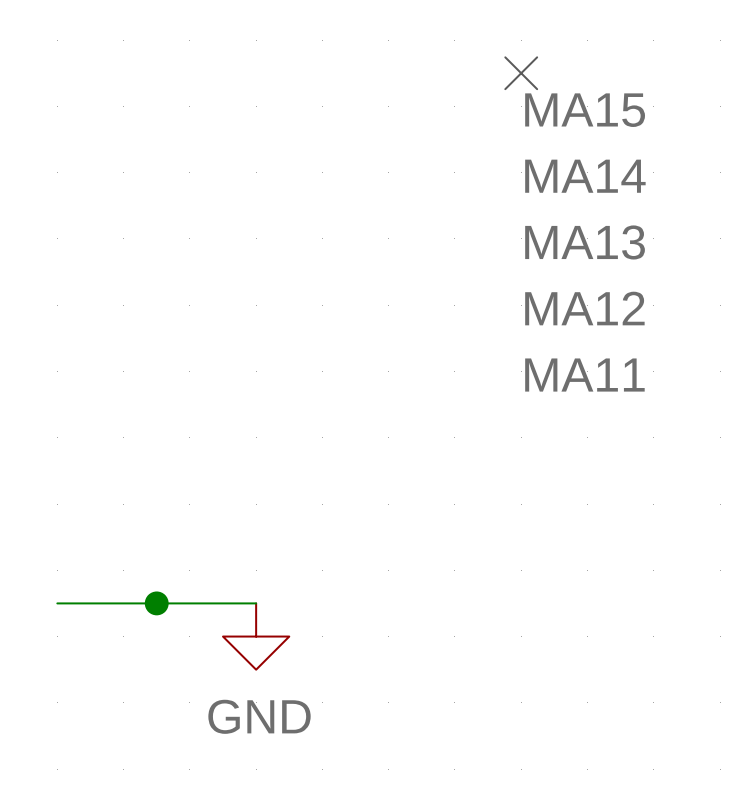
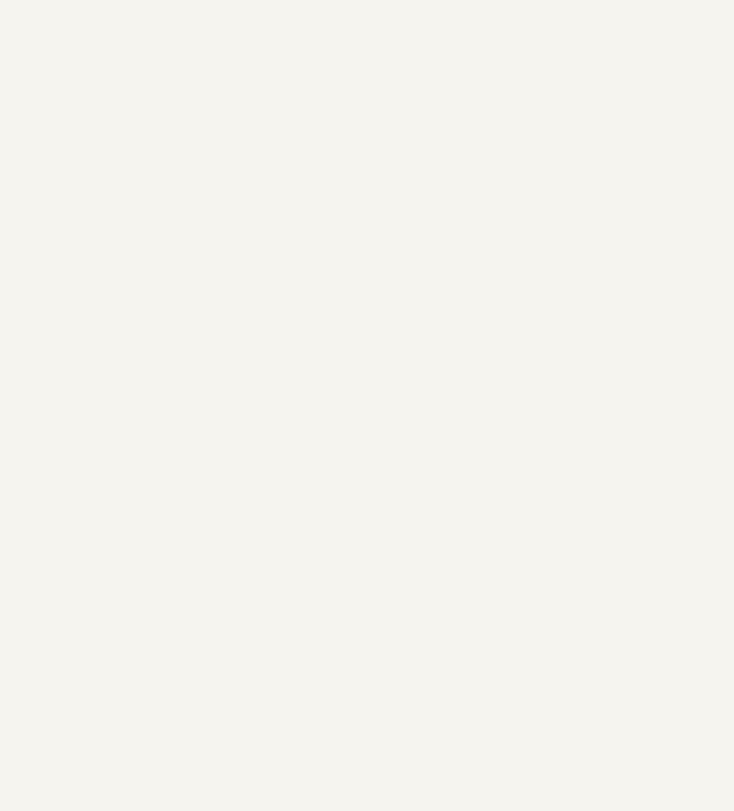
no-connect mark: (521, 73) -> none
label: MA15 (585, 110) -> none
label: MA14 (585, 176) -> none
label: MA13 (585, 242) -> none
label: MA12 (584, 308) -> none
label: MA11 (584, 375) -> none
wire: (57, 603) (256, 603) -> none
junction: (156, 603) -> none
power symbol: GND (256, 636) -> none

